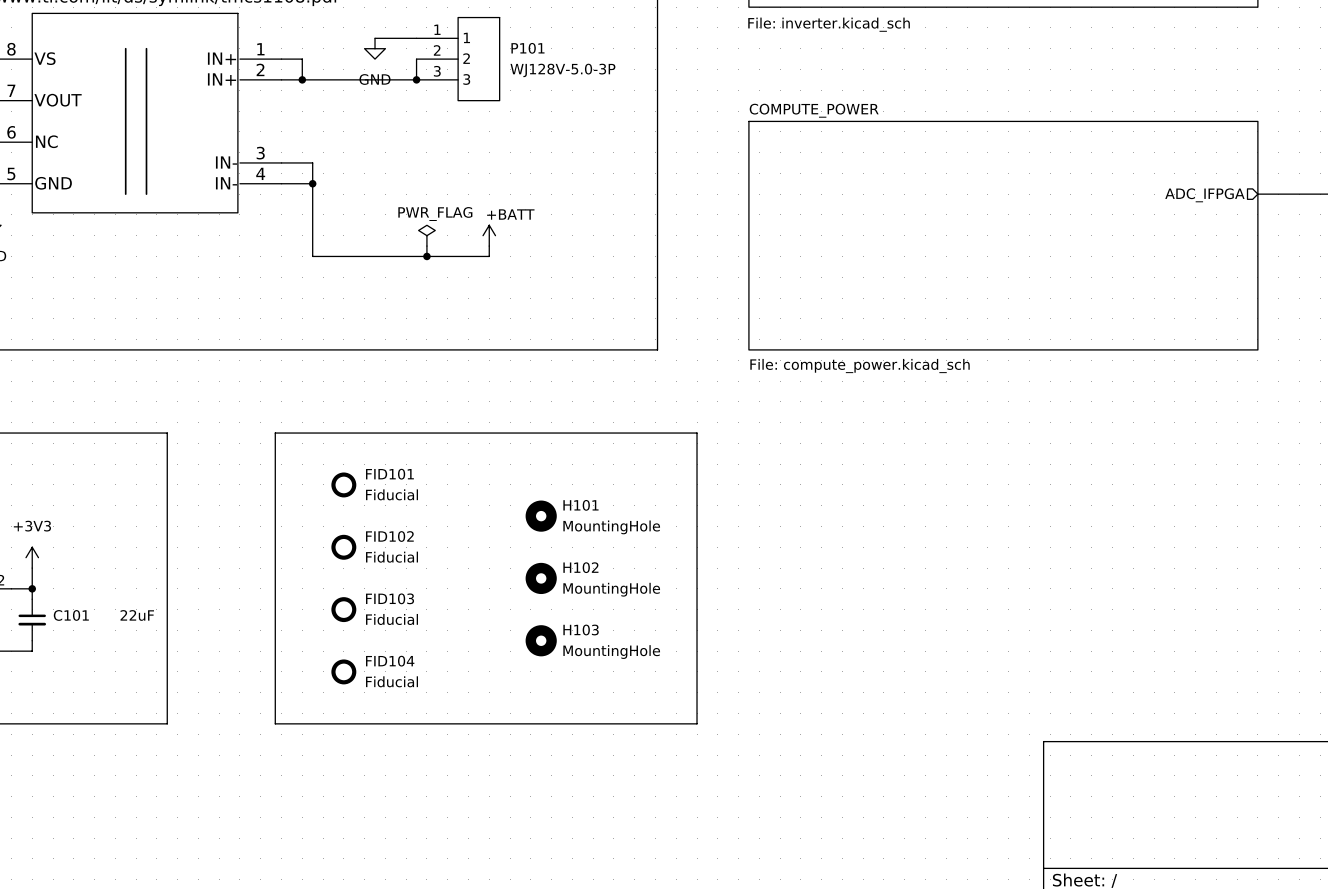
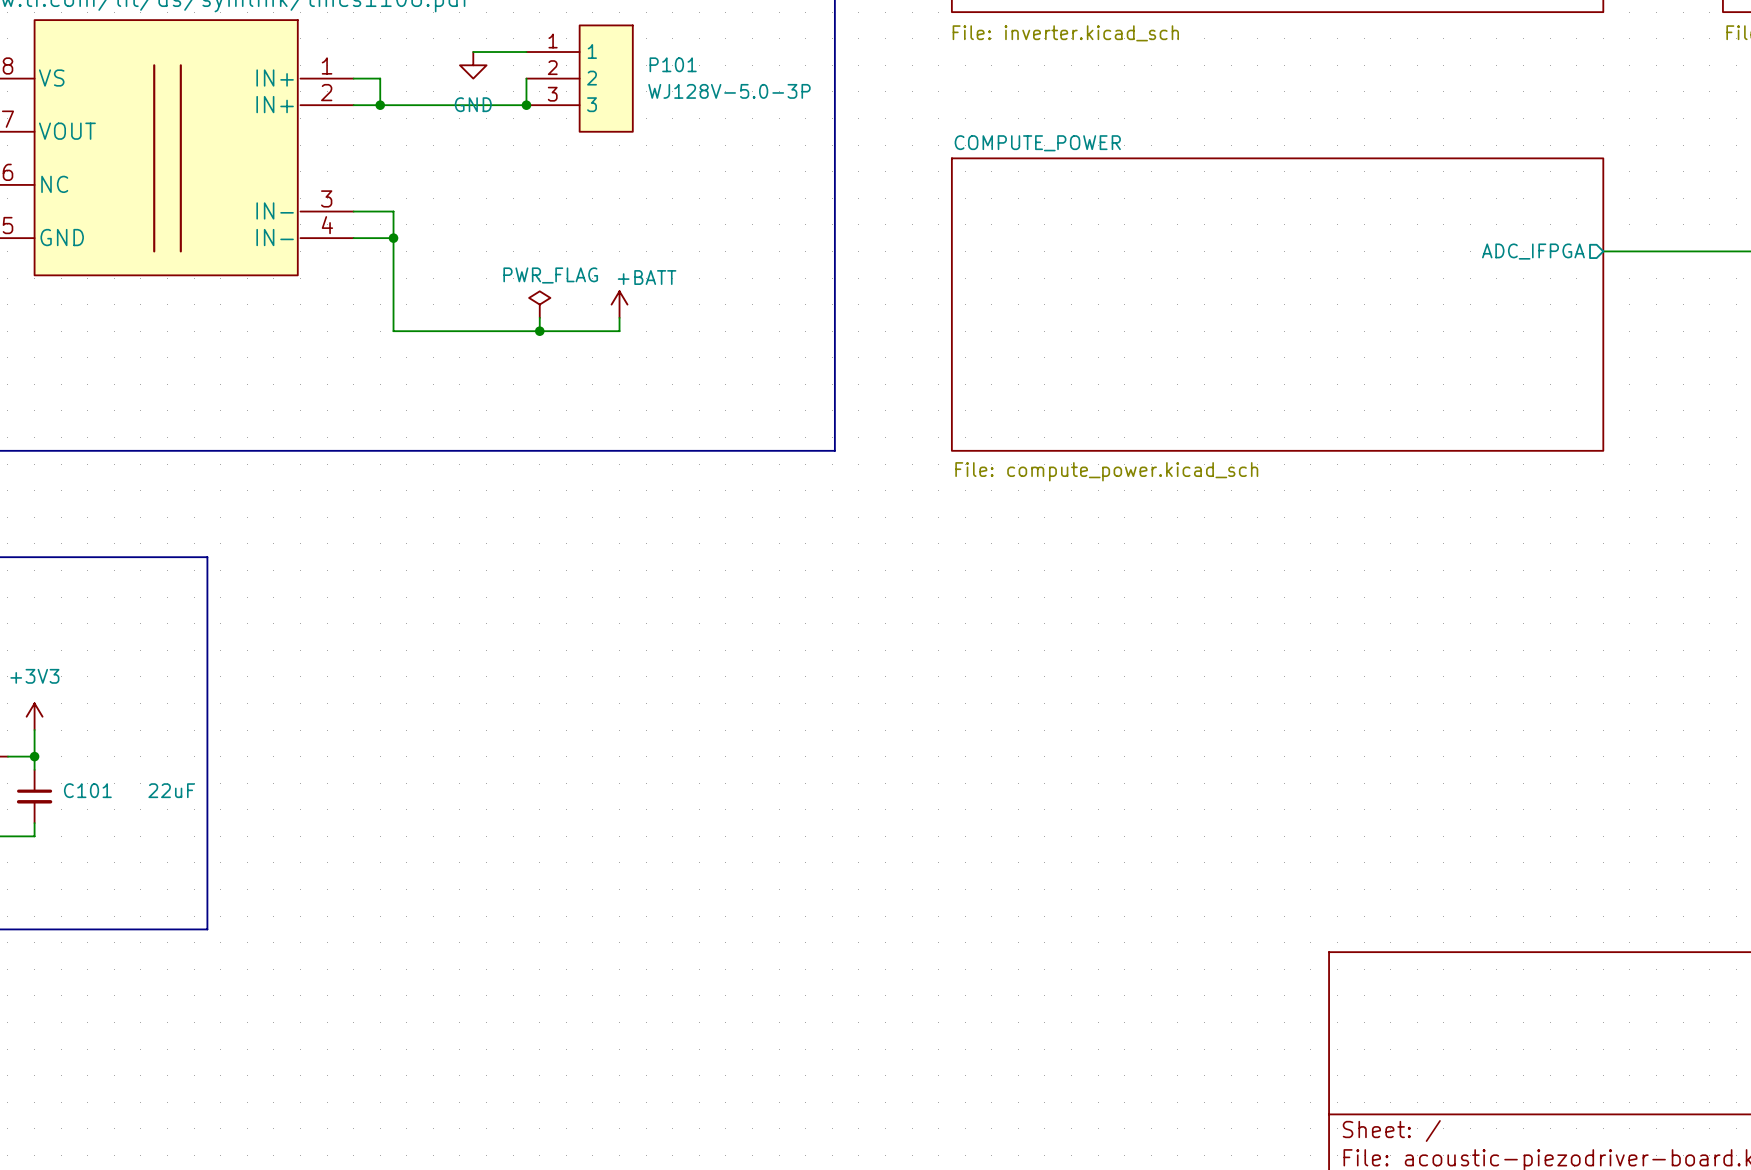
line: (275, 433) (697, 433) (697, 723) (275, 723) (275, 433) -> none
FID101: Fiducial (343, 484) -> none
H101: MountingHole (541, 516) -> none
FID102: Fiducial (343, 547) -> none
H102: MountingHole (541, 578) -> none
FID103: Fiducial (343, 609) -> none
H103: MountingHole (541, 640) -> none
FID104: Fiducial (343, 671) -> none

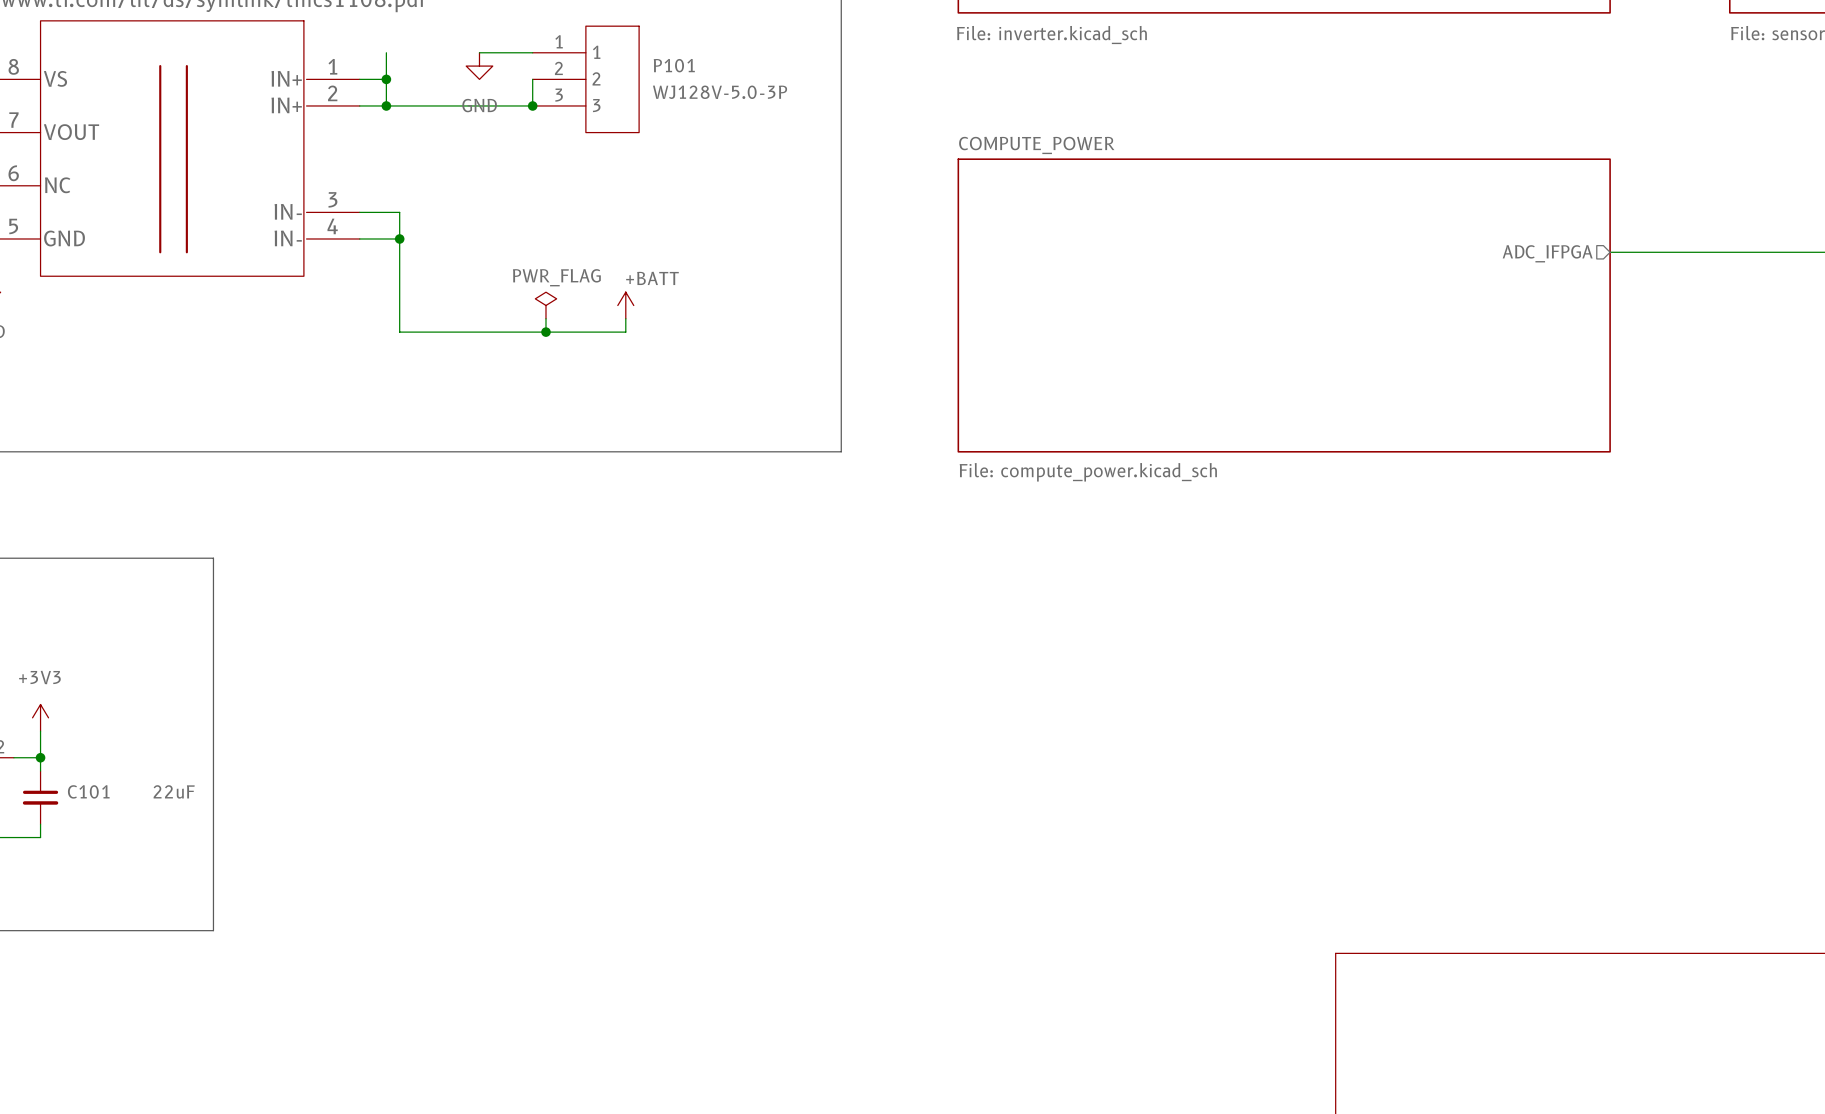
wire: none -> (386, 52) (386, 79)
junction: none -> (386, 79)

